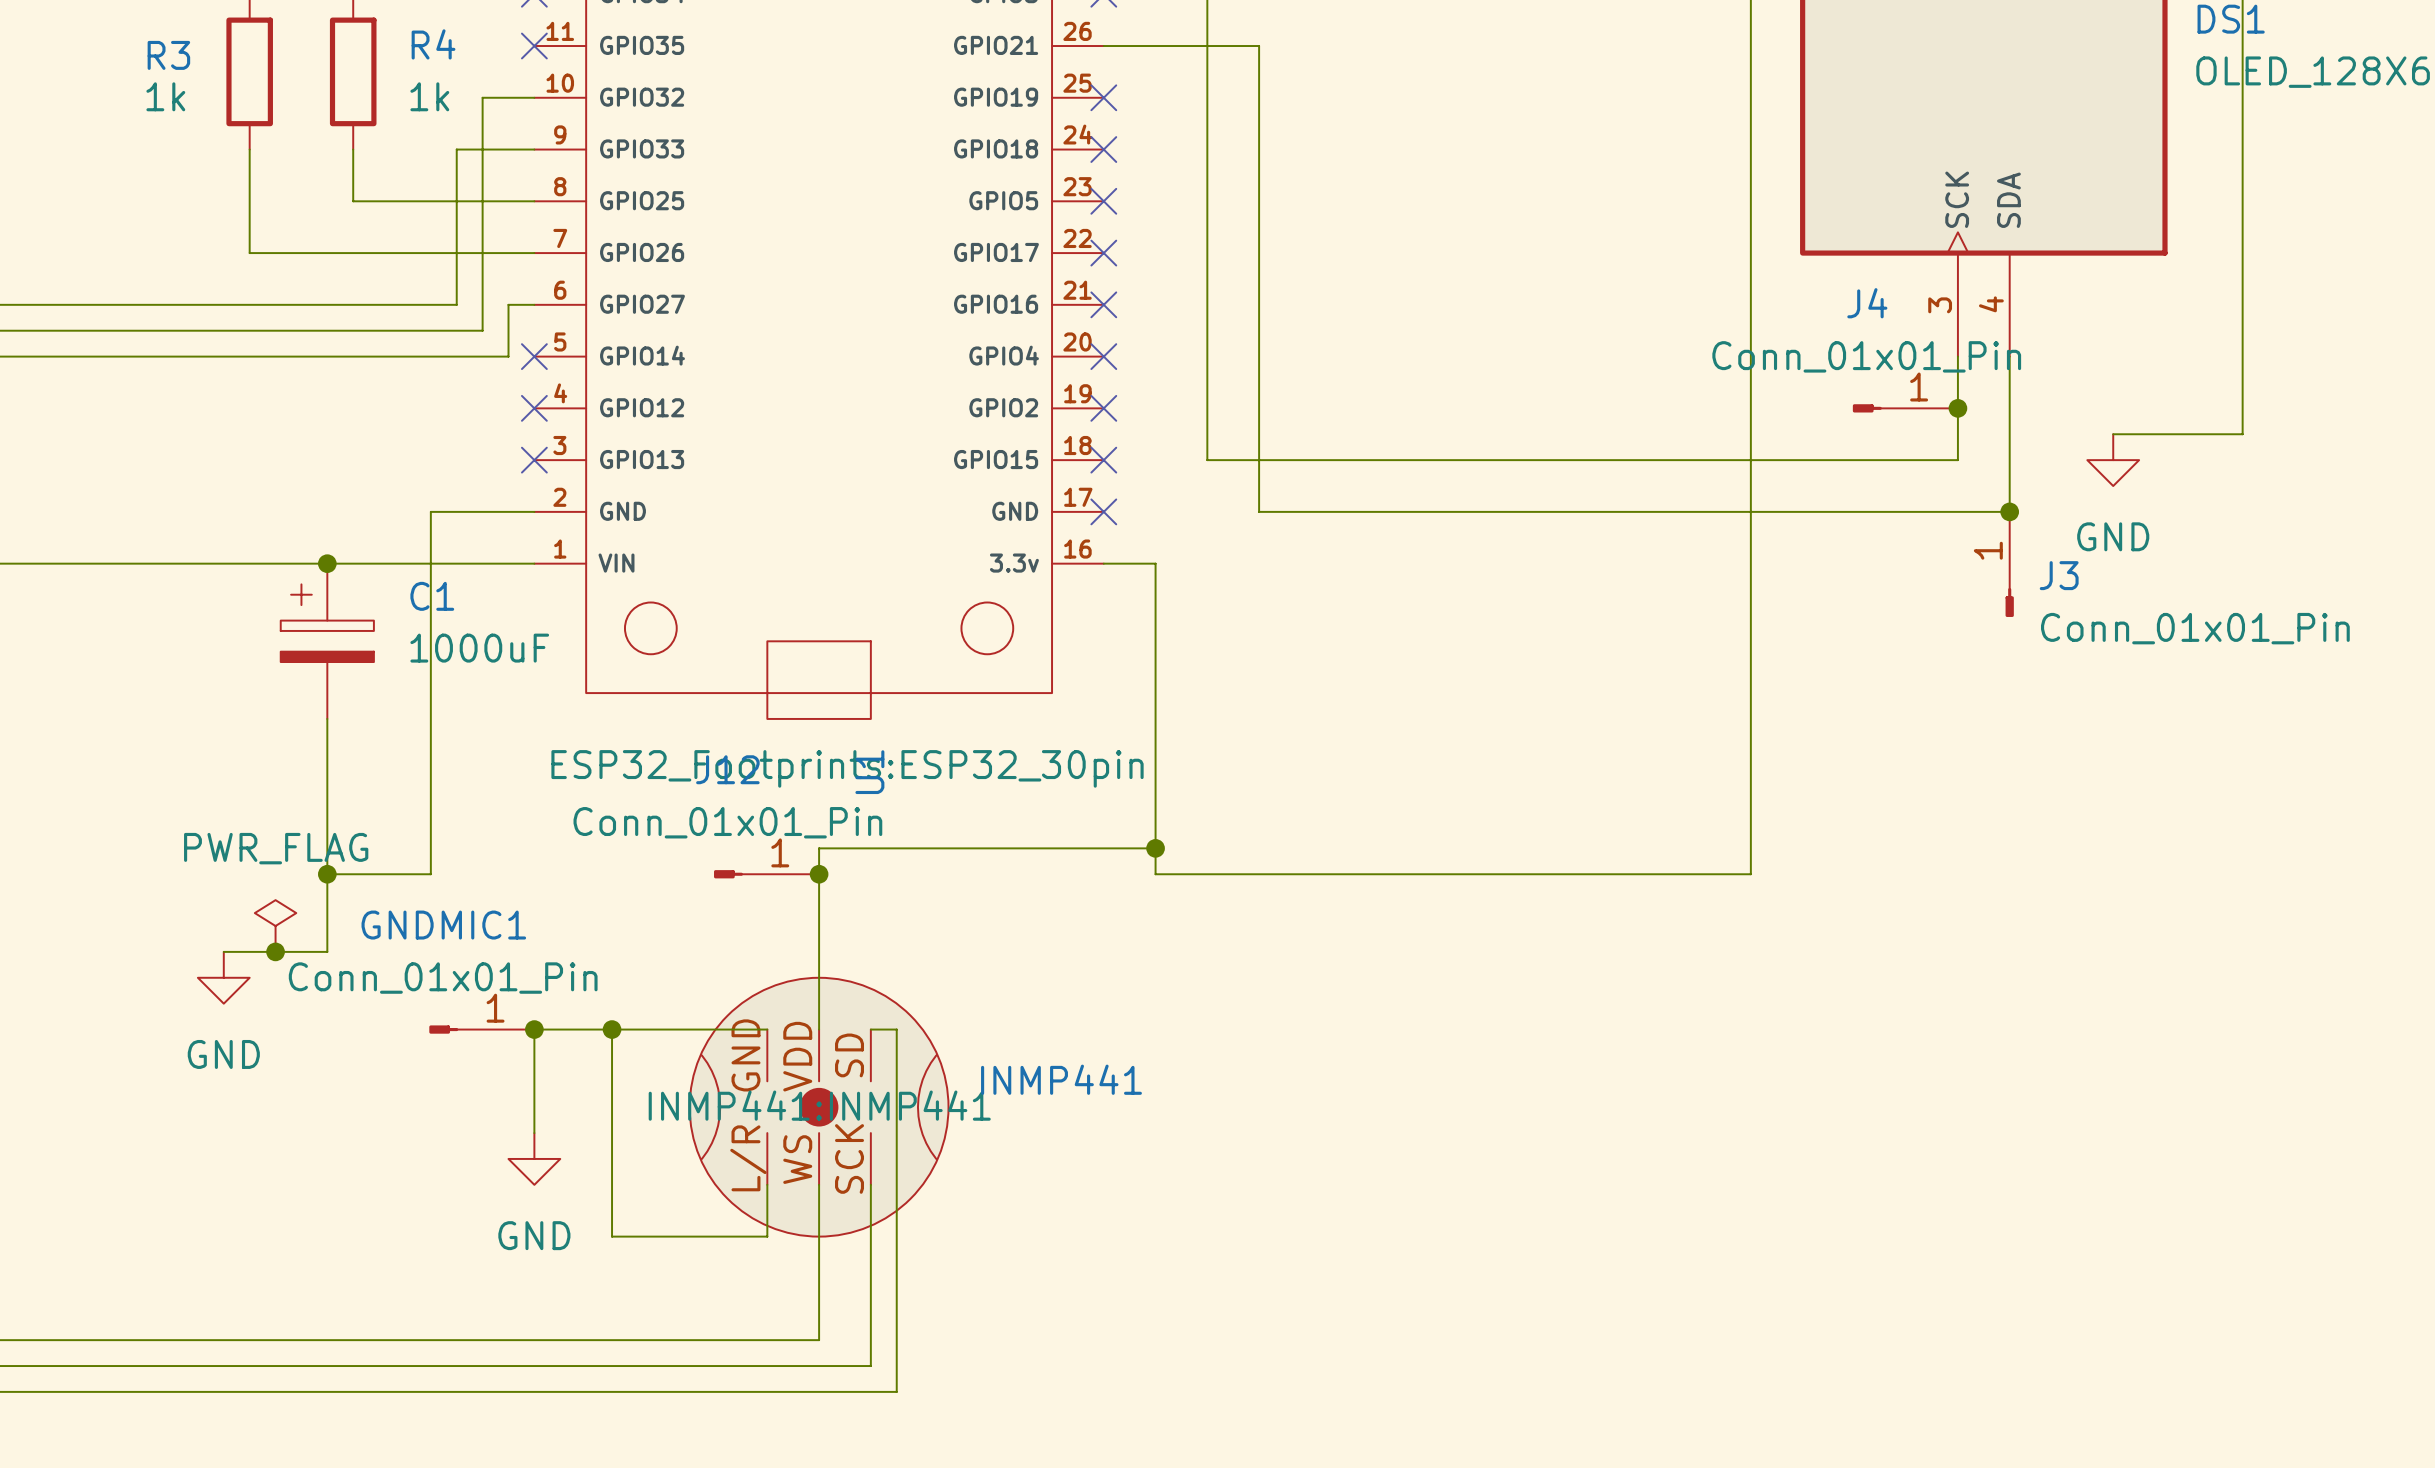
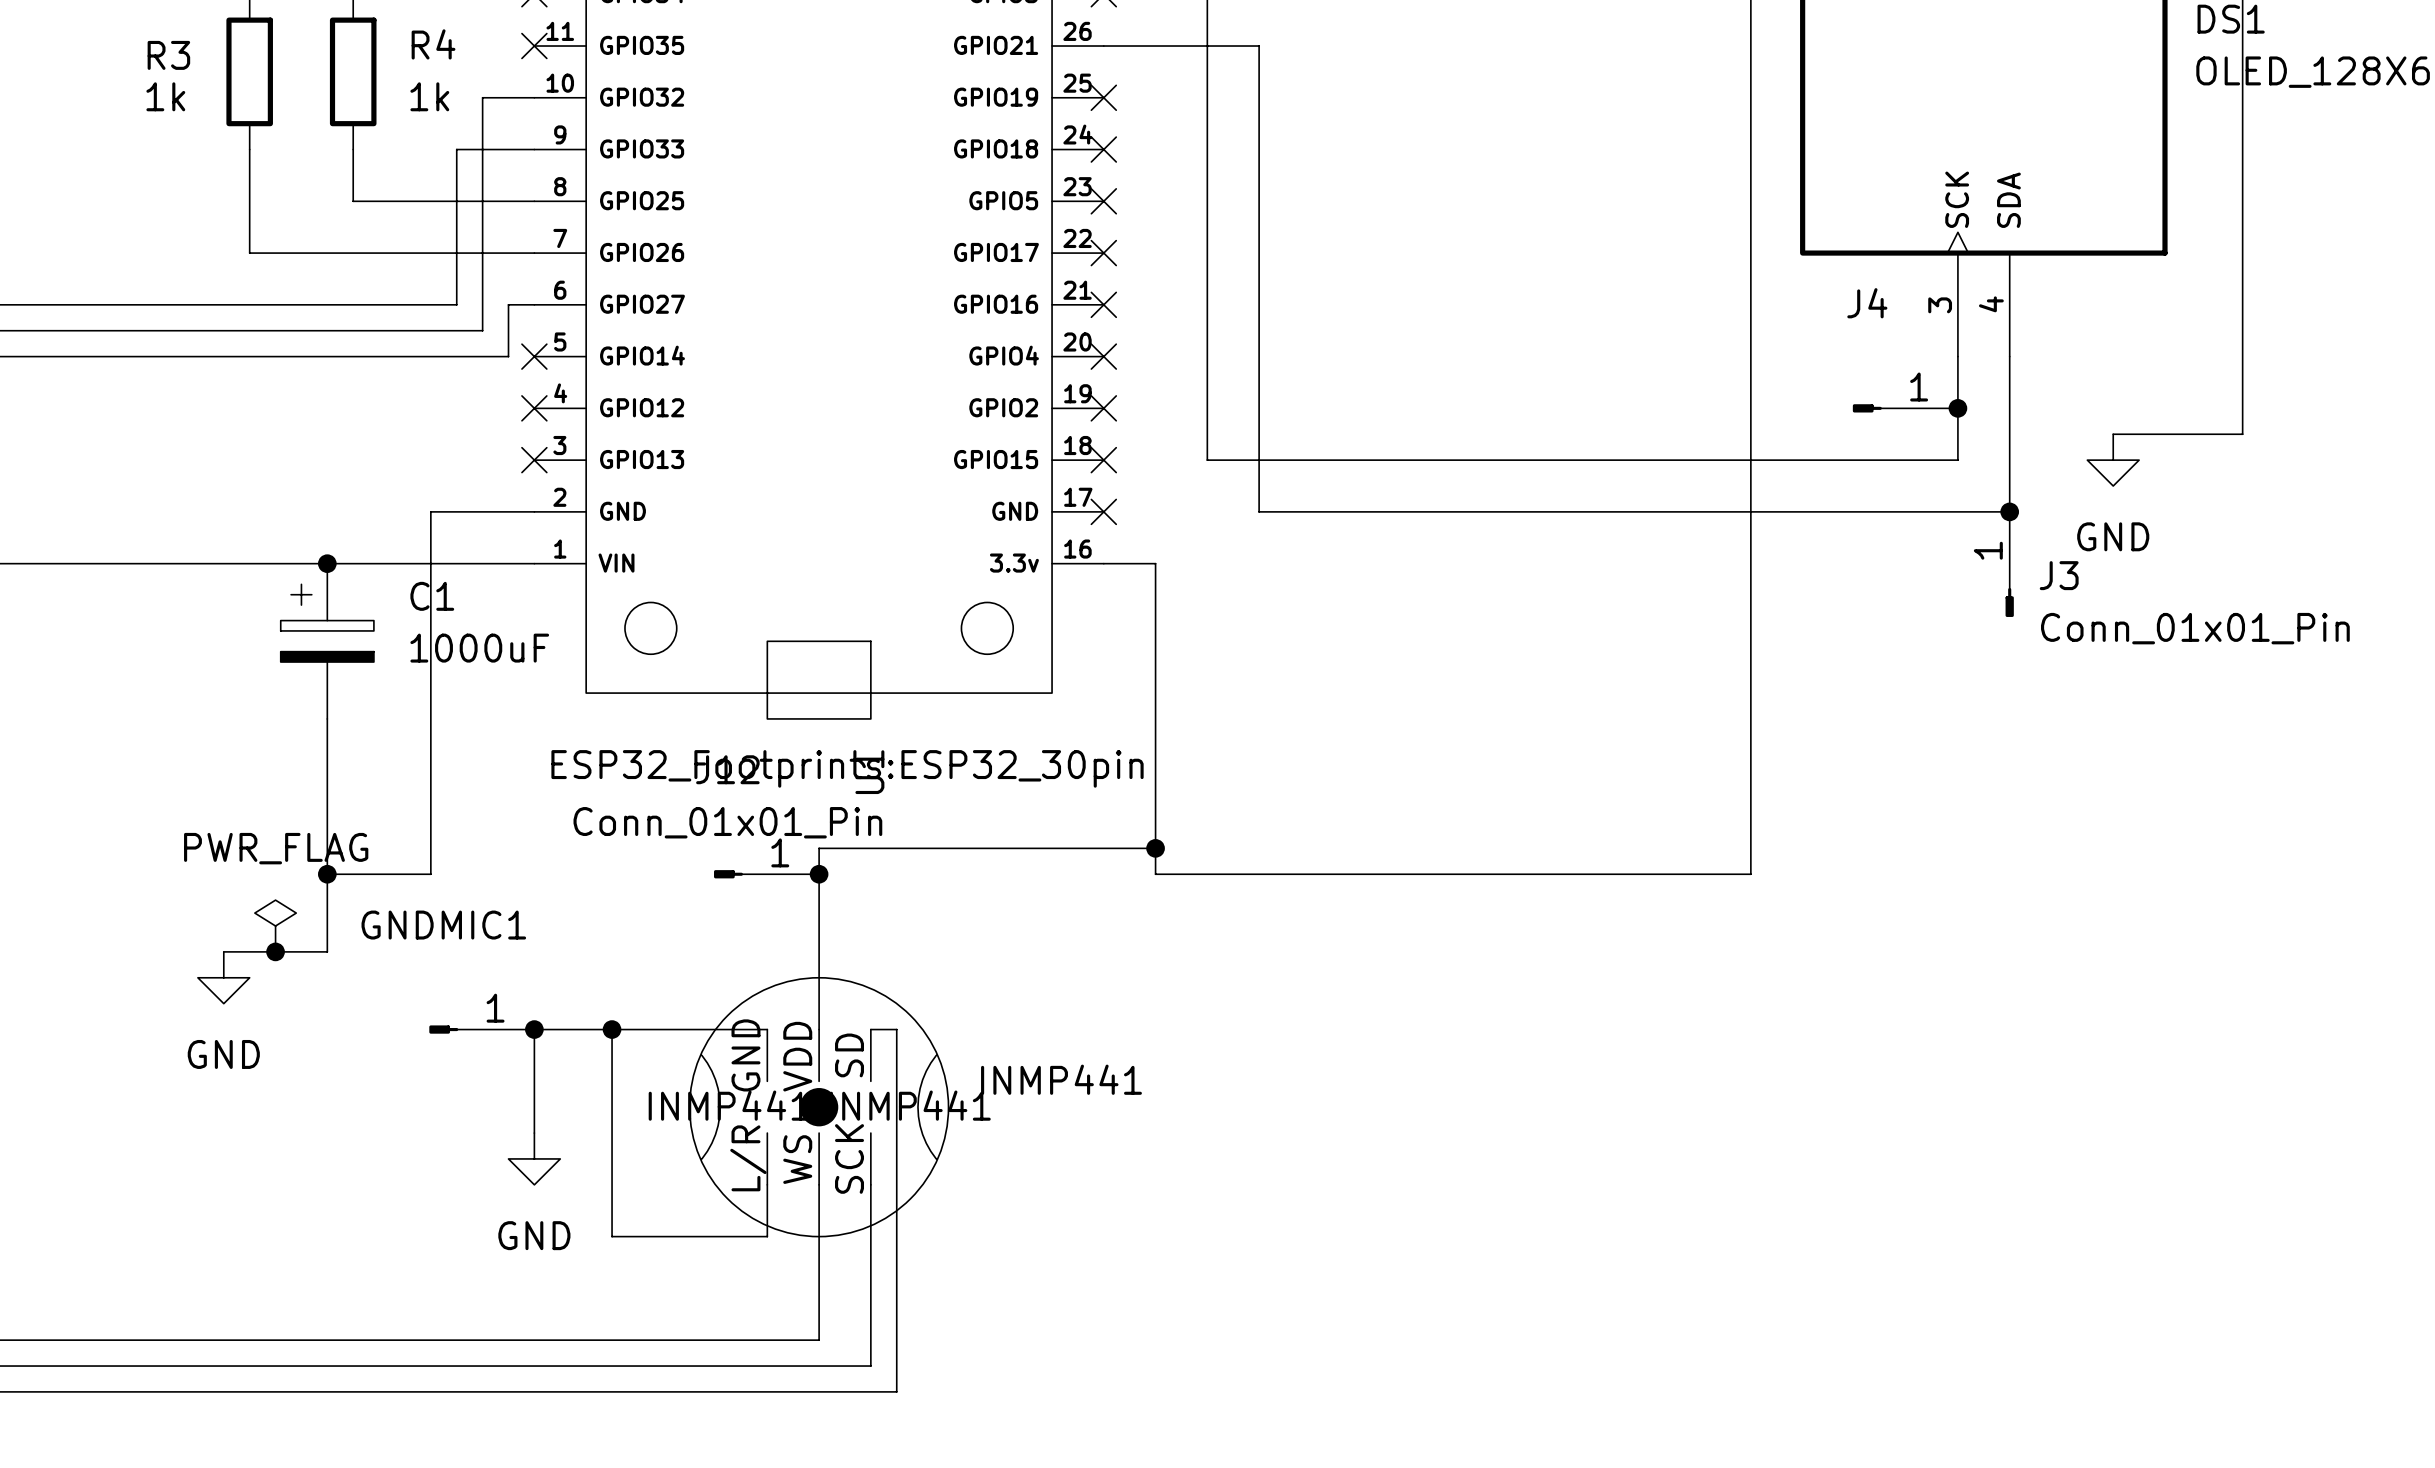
J4 value: Conn_01x01_Pin (1866, 356) -> none
GNDMIC1 value: Conn_01x01_Pin (443, 978) -> none

